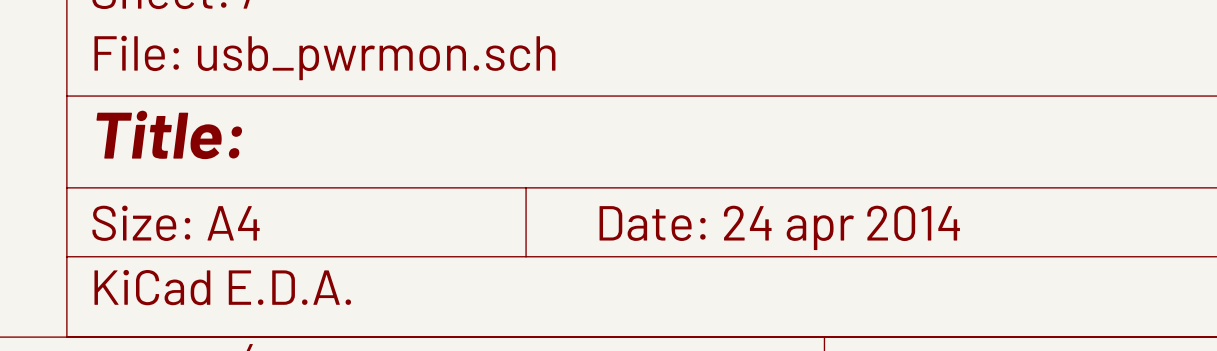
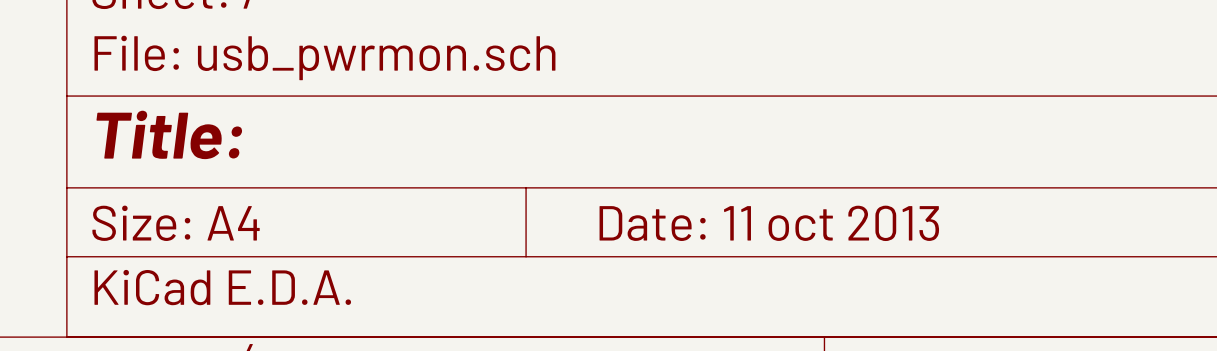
title block: Date: 24 apr 2014 (779, 227) -> Date: 11 oct 2013 (769, 223)

